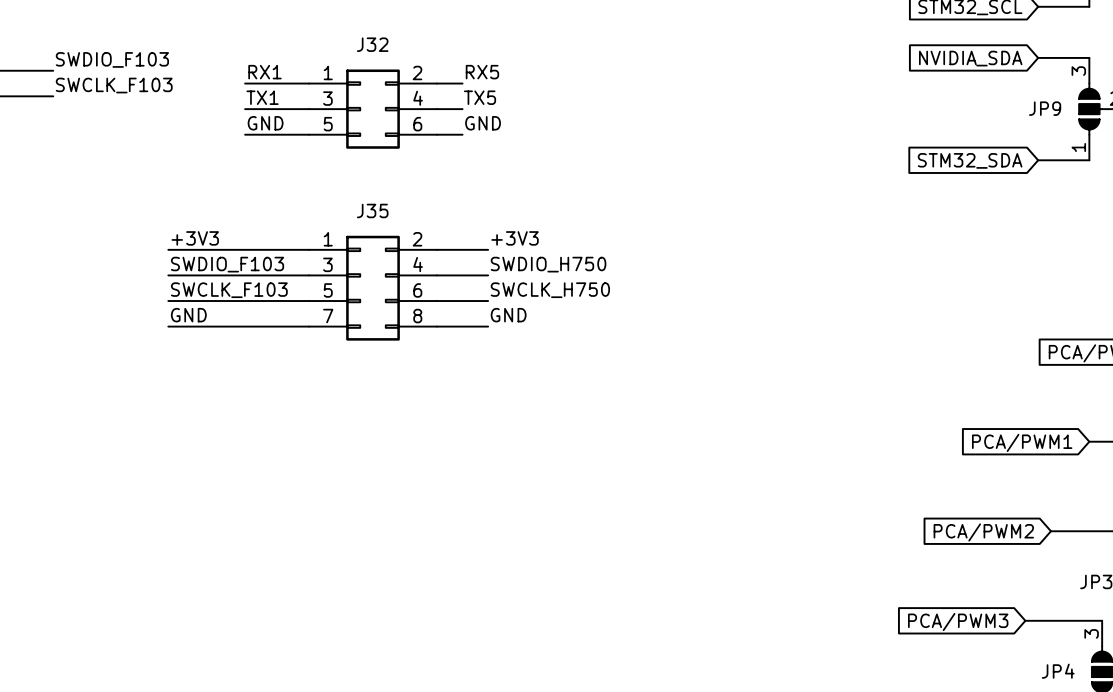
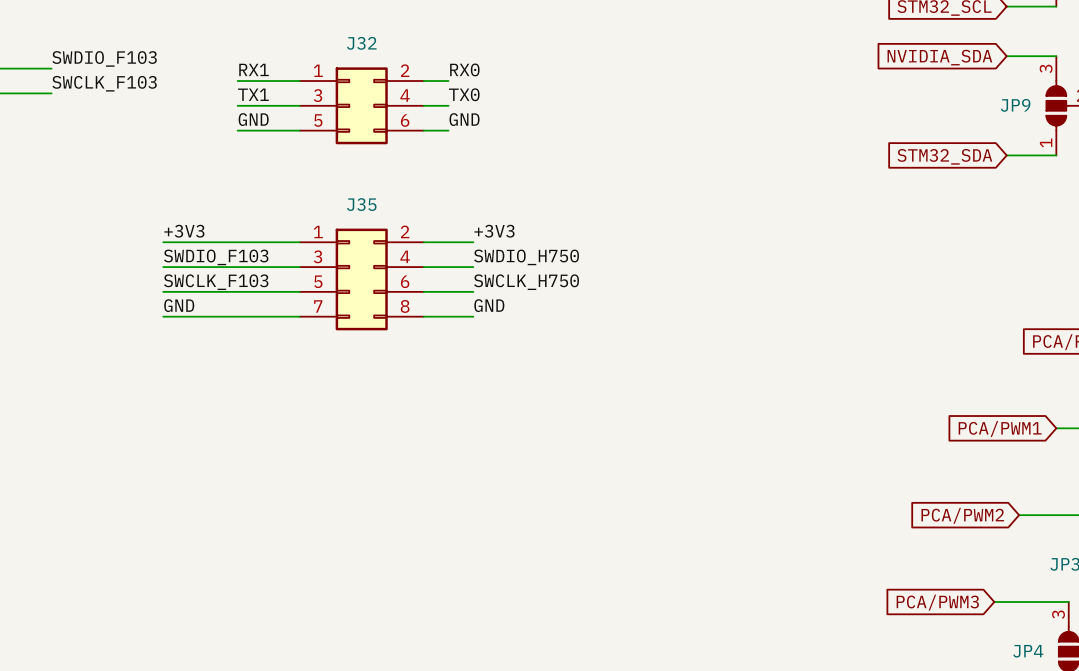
label: RX5 (482, 72) -> RX0 (464, 69)
label: TX5 (480, 97) -> TX0 (464, 94)

